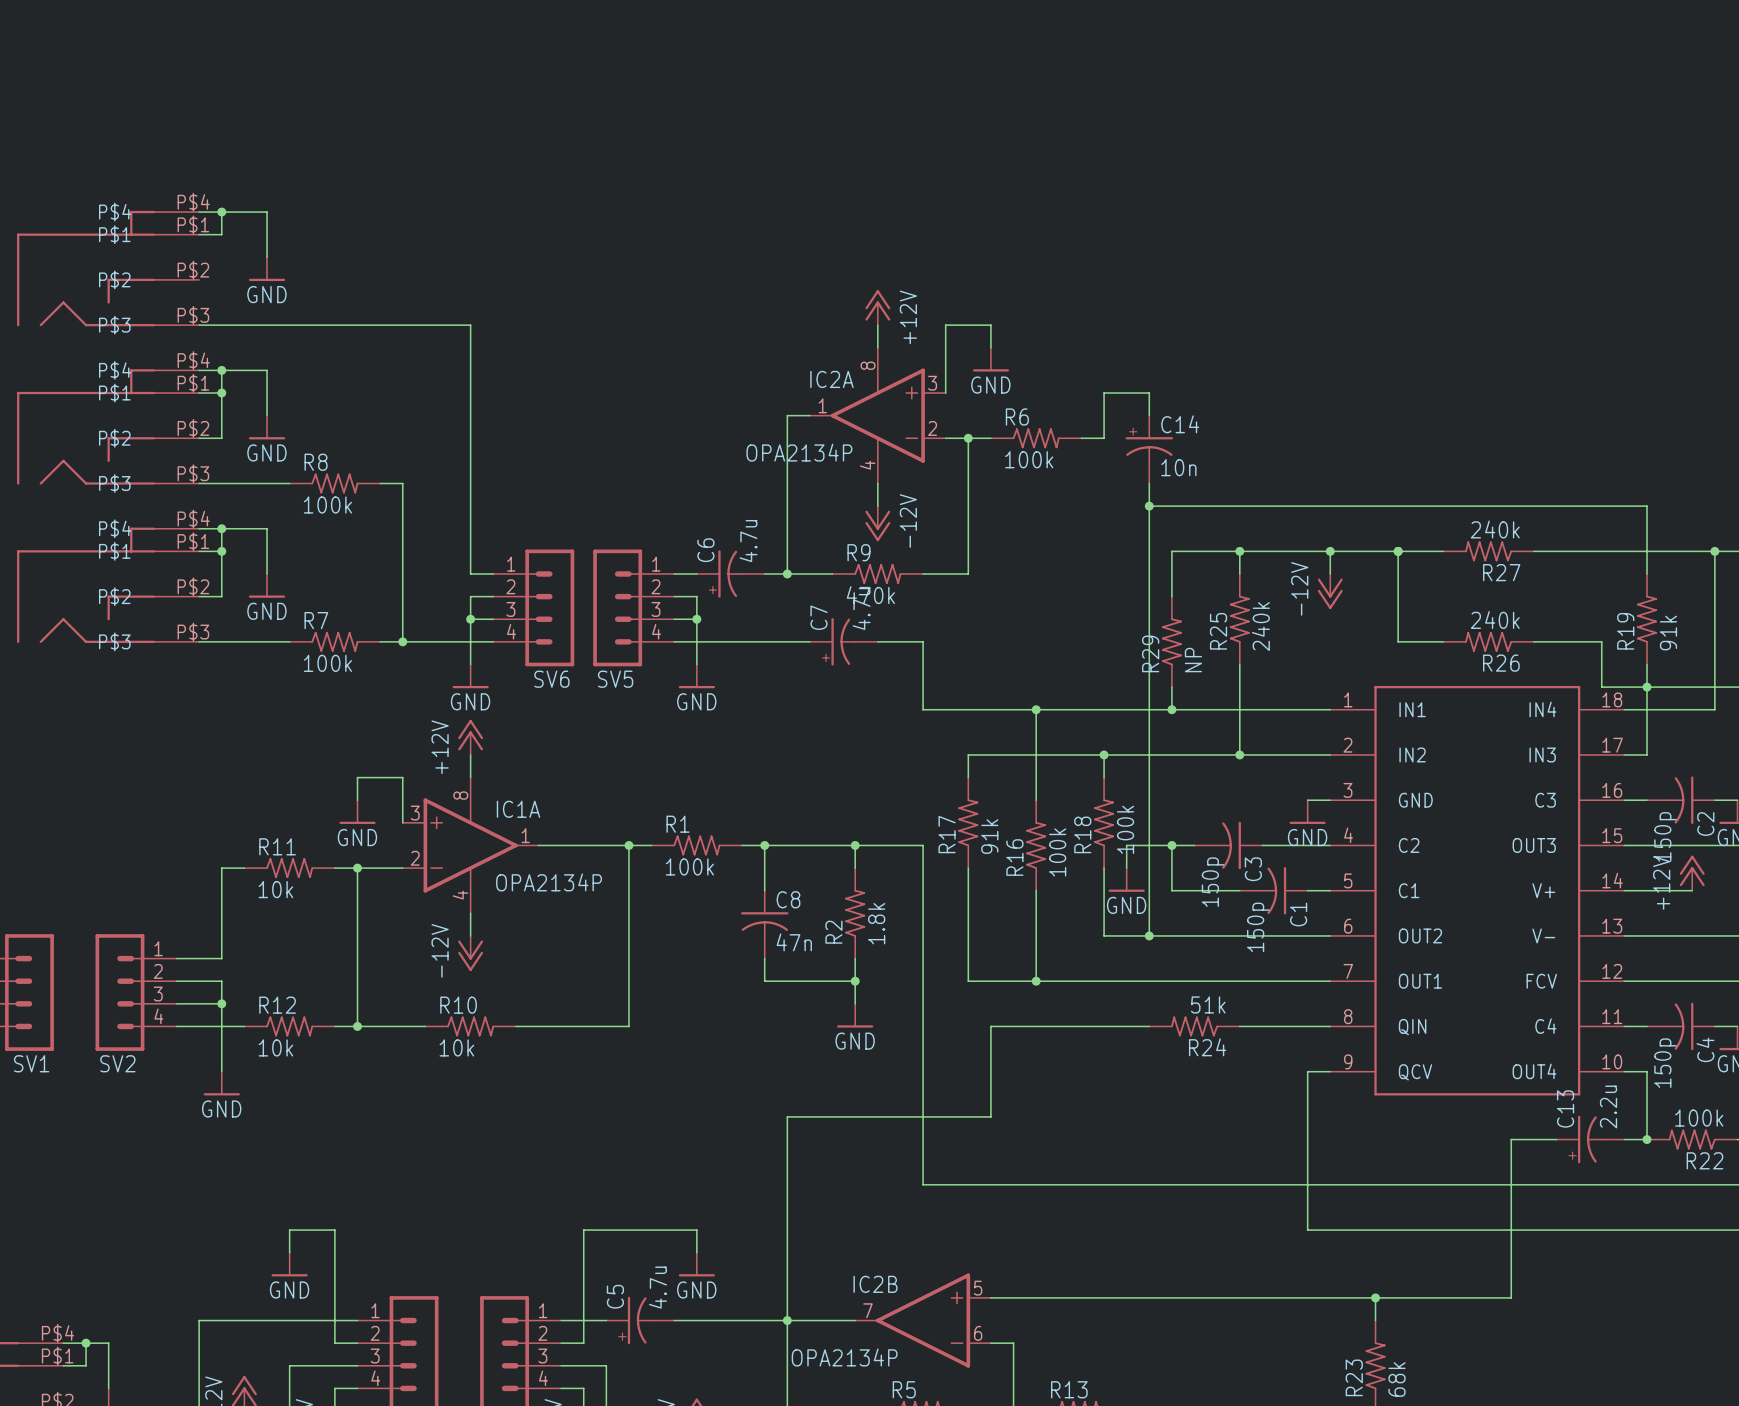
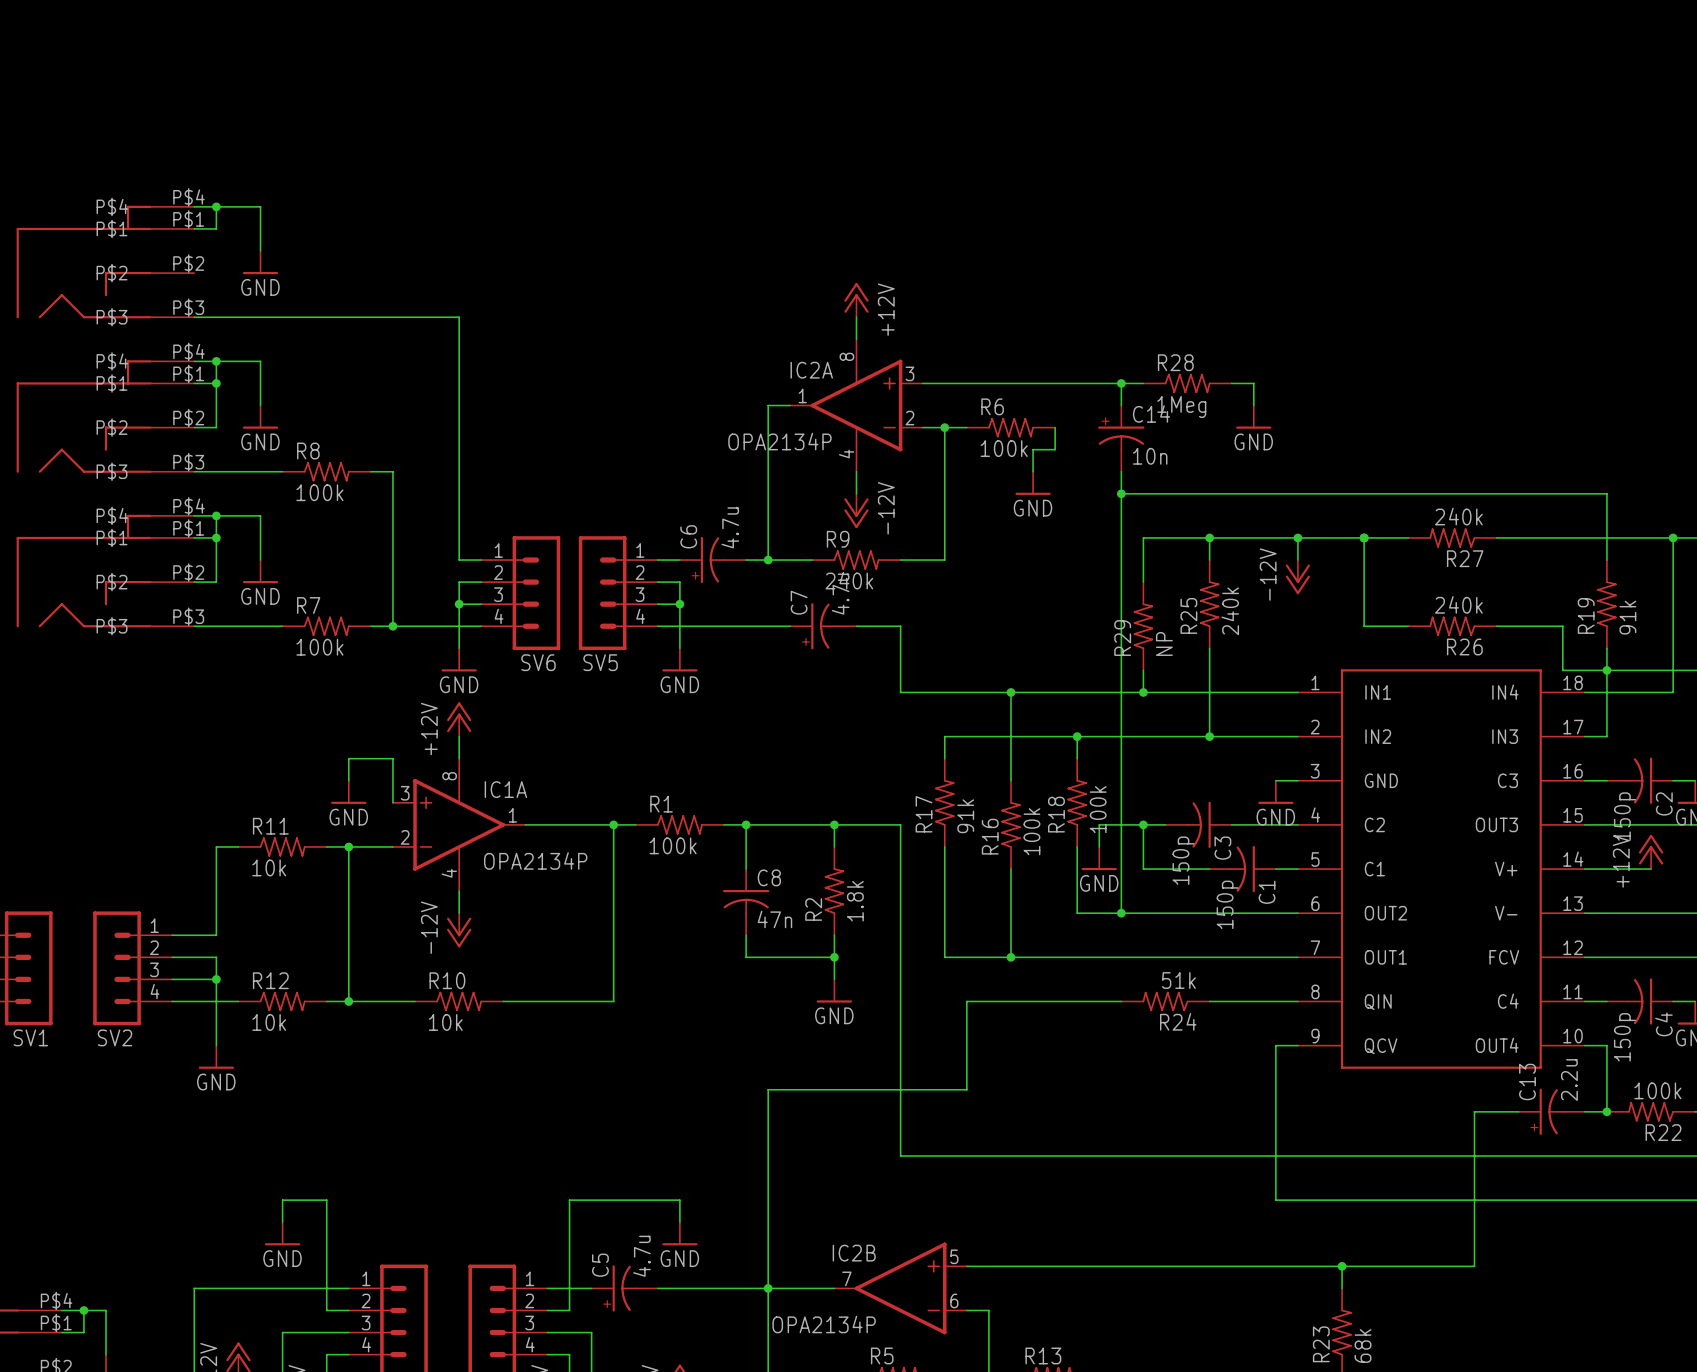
wire: (990, 347) (990, 325) (945, 325) (945, 393) -> (1077, 383) (922, 383)
power symbol: GND (990, 359) -> none
wire: (1104, 393) (1104, 438) (1081, 438) -> (1033, 471) (1033, 449) (1055, 449) (1055, 427)
wire: none -> (1121, 383) (1143, 383)
junction: none -> (1121, 383)
R28: none -> 1Meg (1187, 383)
wire: none -> (1231, 383) (1253, 383) (1253, 405)
power symbol: none -> GND (1253, 417)
power symbol: none -> GND (1033, 483)
R9 value: 470k (870, 595) -> 240k (849, 580)

